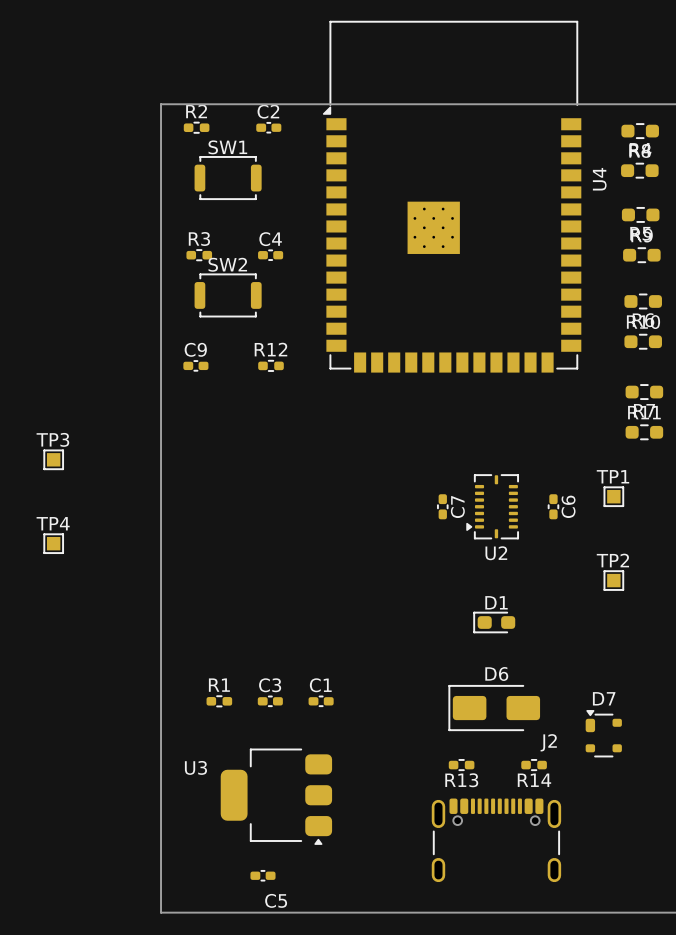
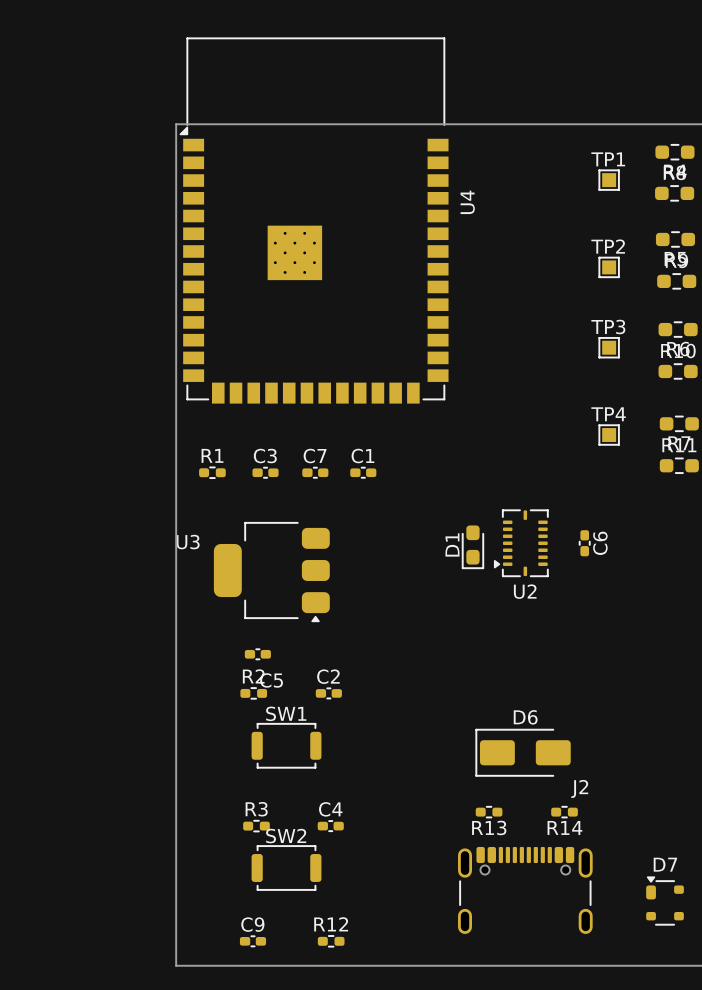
R2 position: (196, 127) -> (253, 693)
C2 position: (268, 127) -> (328, 693)
SW1 position: (228, 178) -> (286, 745)
U4 position: (452, 196) -> (314, 220)
R3 position: (199, 255) -> (256, 826)
C4 position: (270, 255) -> (330, 826)
SW2 position: (228, 295) -> (286, 867)
C9 position: (195, 365) -> (252, 941)
R12 position: (271, 365) -> (331, 941)
TP3 position: (53, 459) -> (609, 347)
TP1 position: (613, 496) -> (609, 180)
C7 rotation: 0° (442, 506) -> 90° clockwise (315, 472)
C7 position: (442, 506) -> (315, 472)
TP4 position: (53, 543) -> (609, 435)
TP2 position: (613, 580) -> (609, 267)
D1 rotation: 0° (494, 622) -> 90° counterclockwise (472, 547)
D1 position: (494, 622) -> (472, 547)
R1 position: (219, 701) -> (212, 472)
C3 position: (270, 701) -> (265, 472)
C1 position: (321, 701) -> (363, 472)
D7 position: (603, 733) -> (665, 900)
U3 position: (276, 796) -> (271, 572)
C5 position: (262, 875) -> (257, 654)

